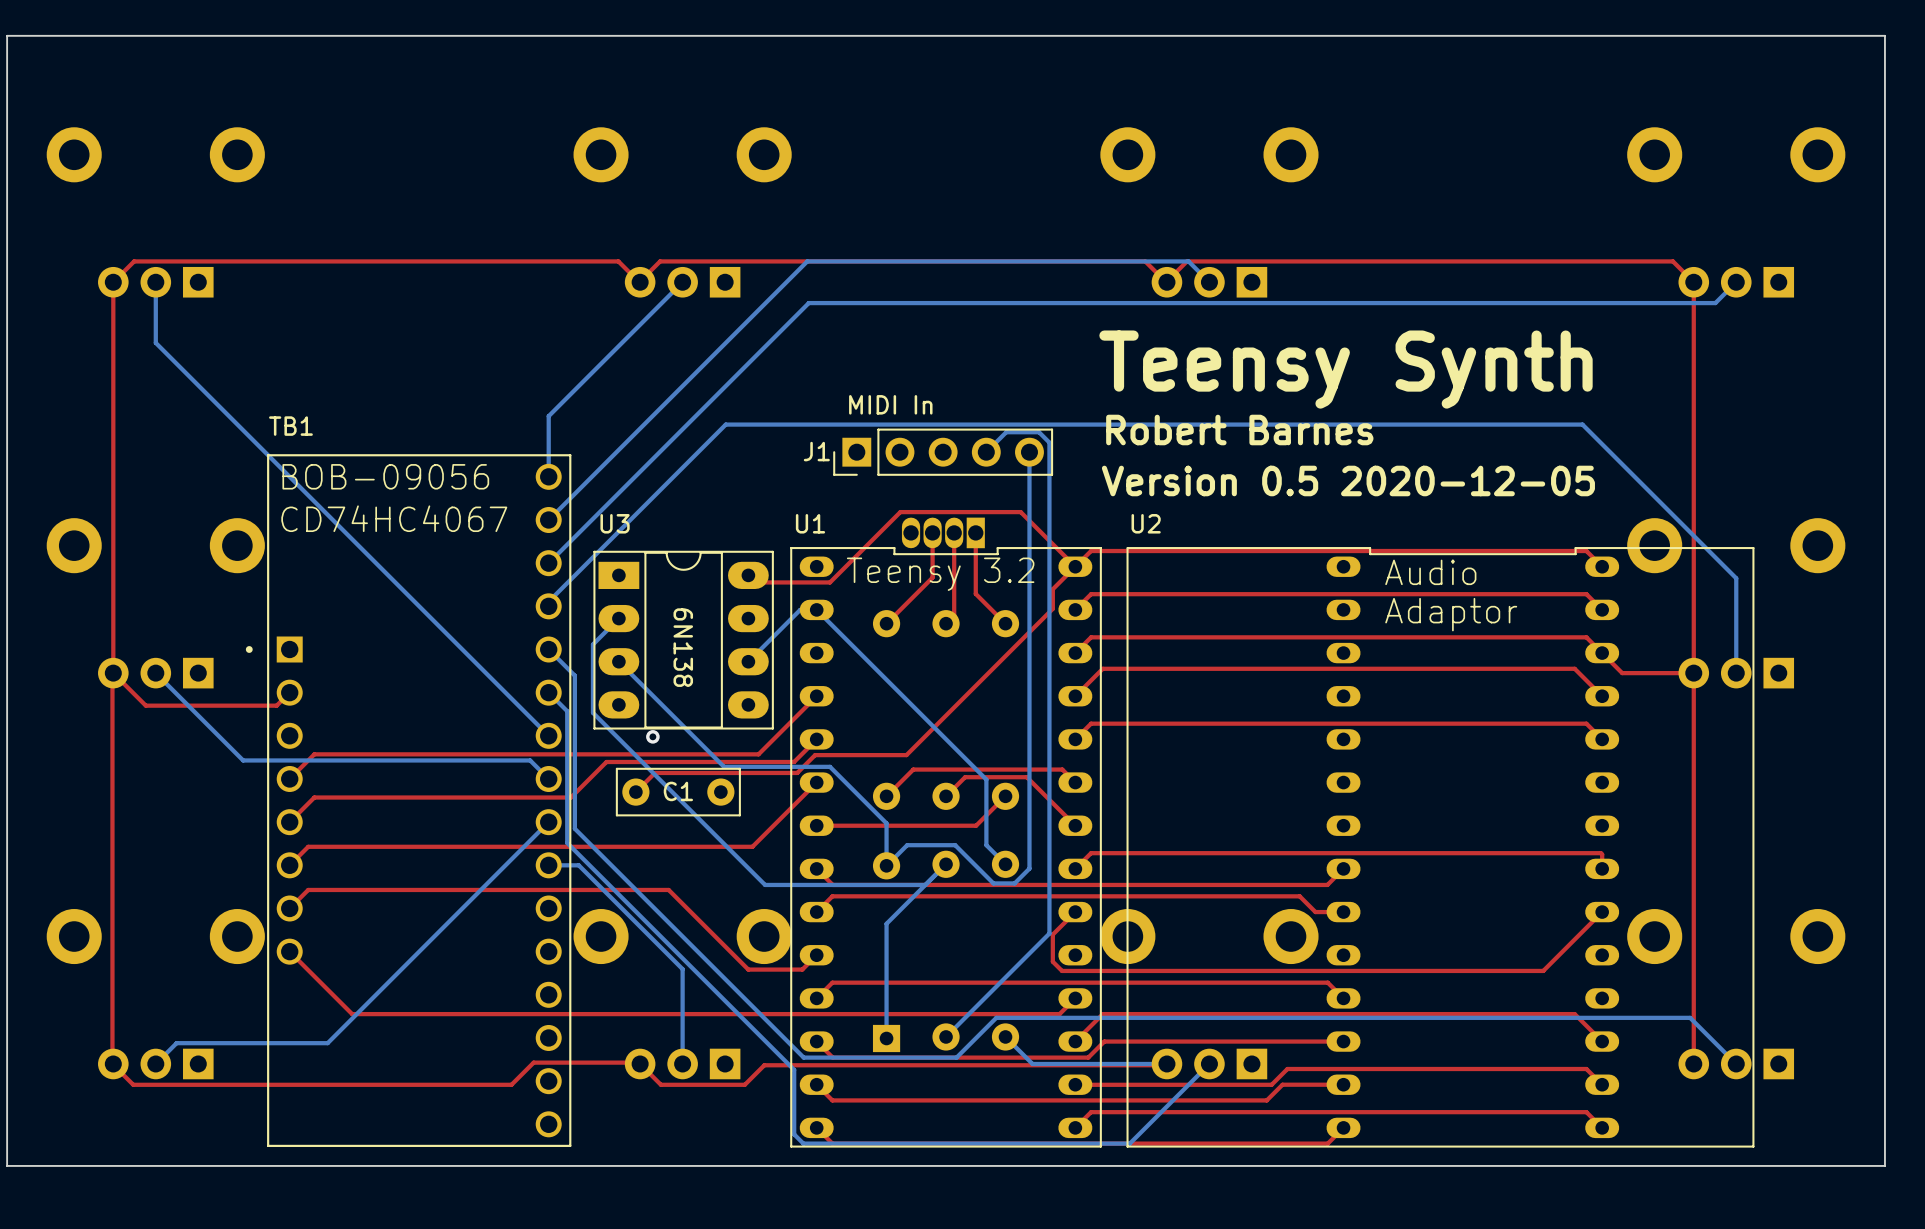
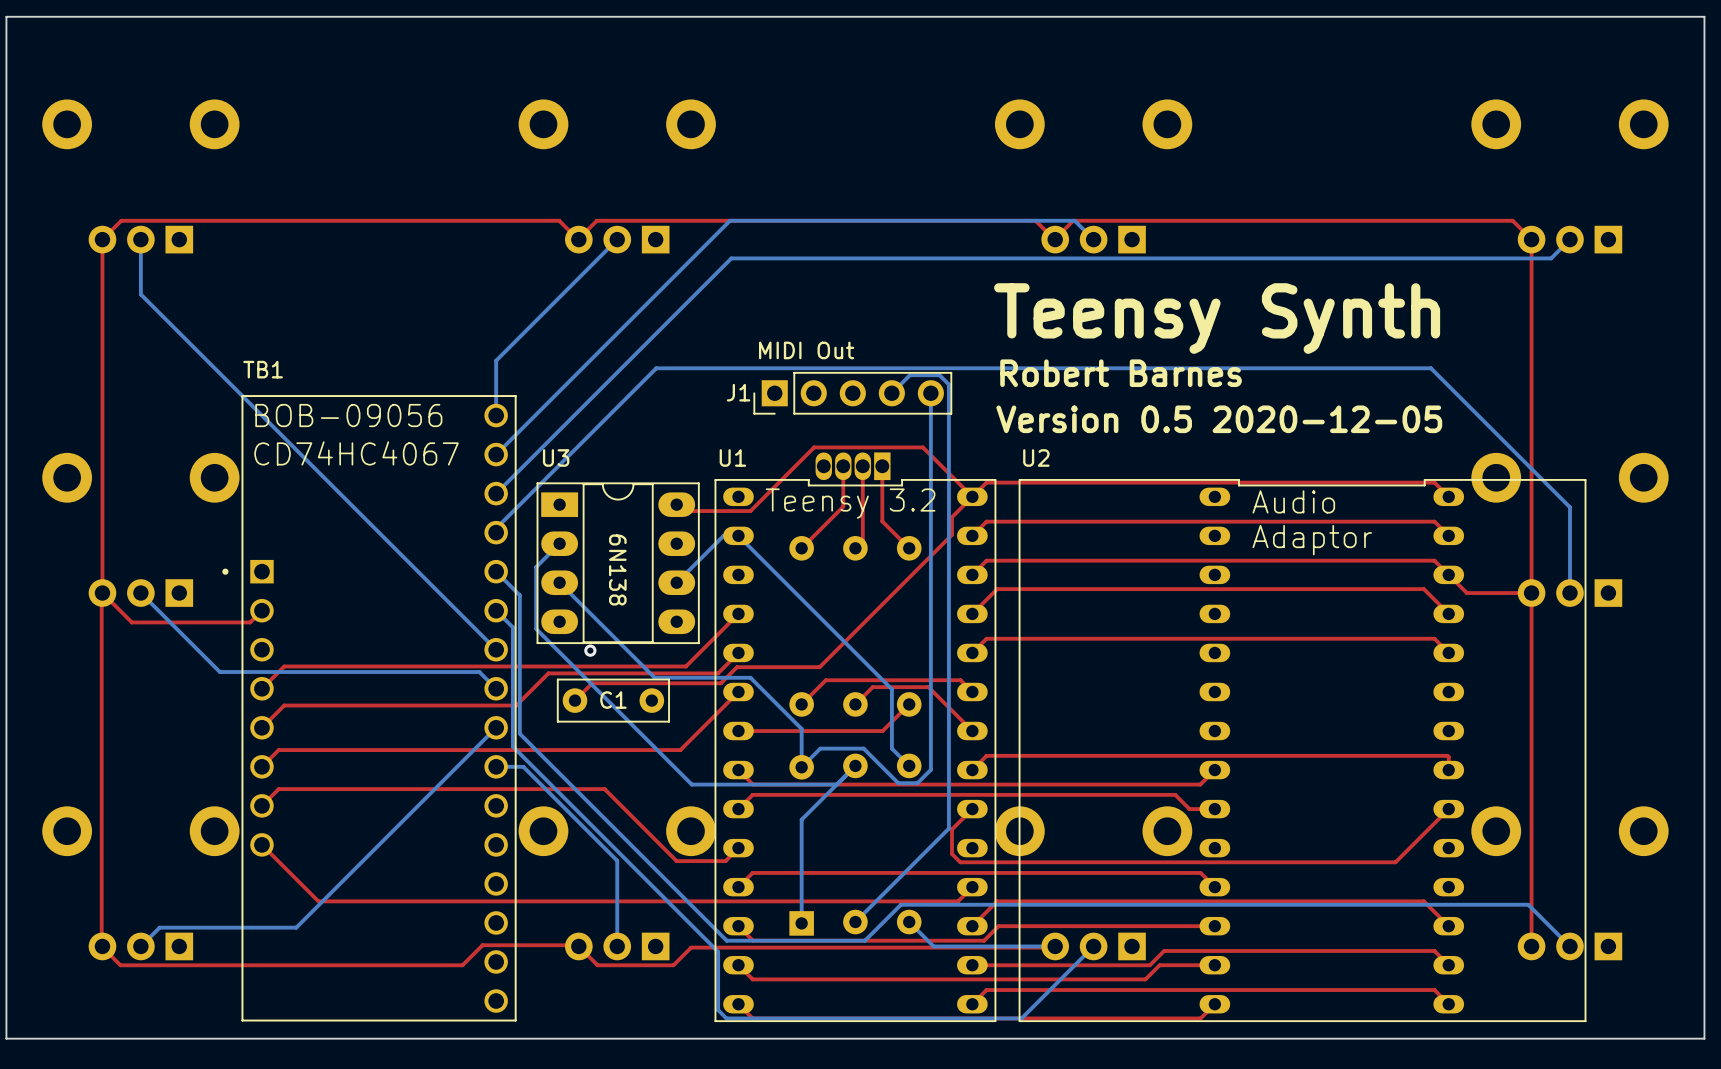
text: MIDI In (890, 404) -> MIDI Out (806, 350)

